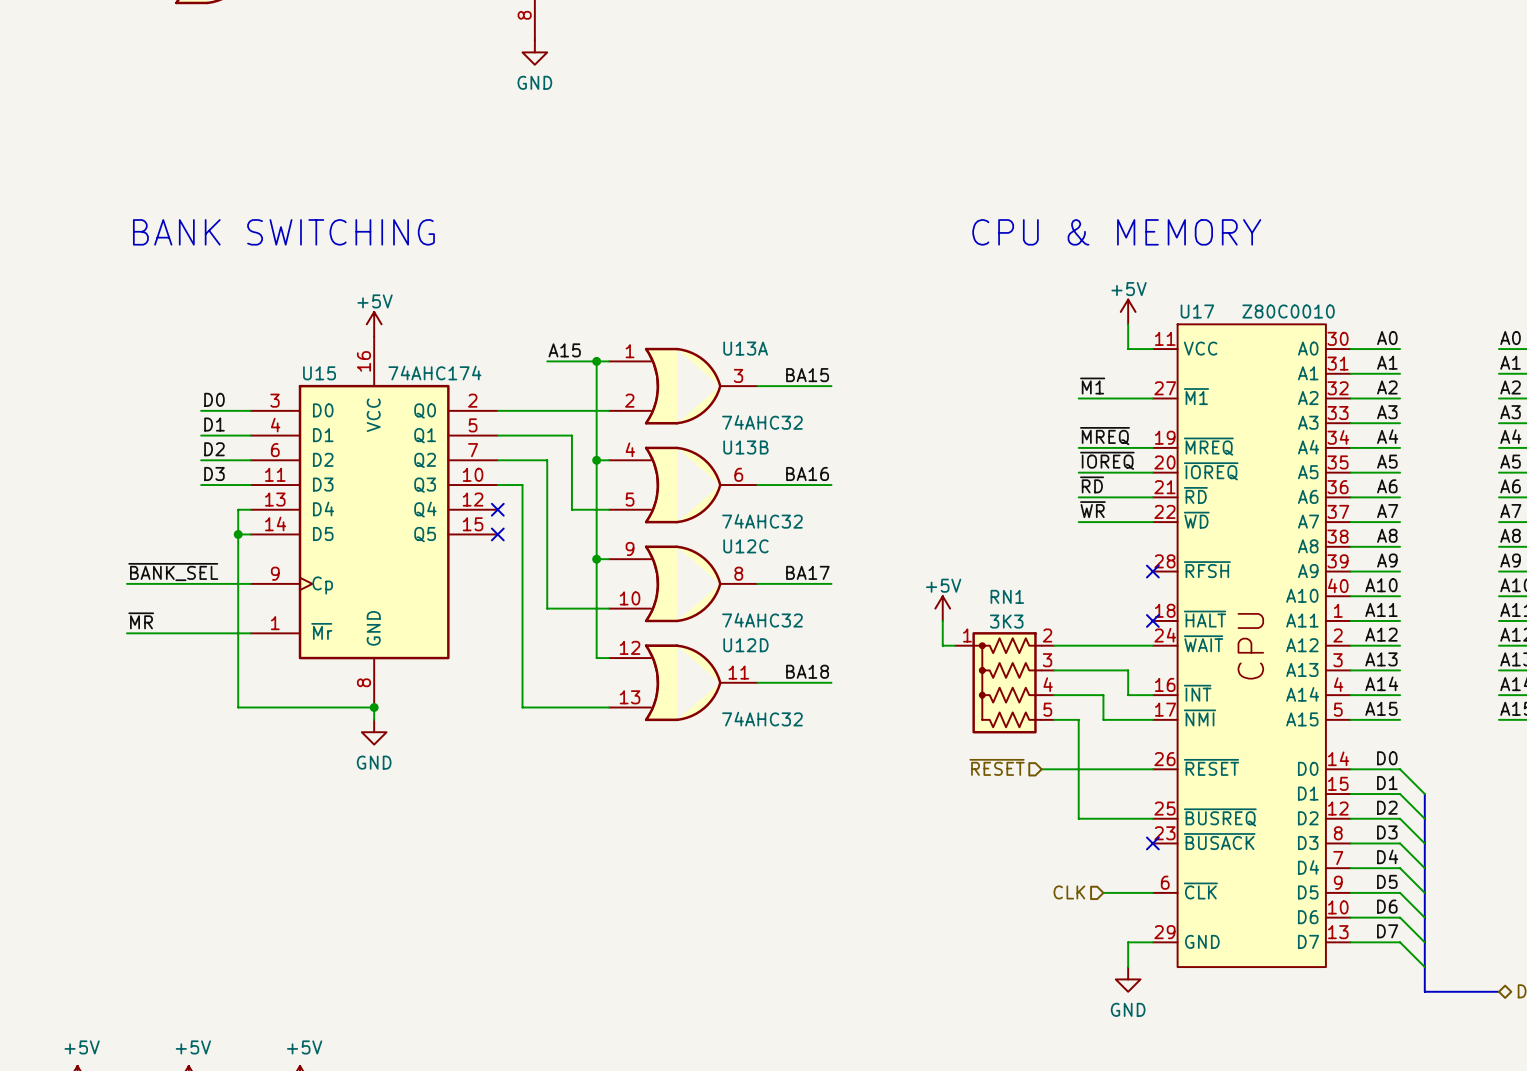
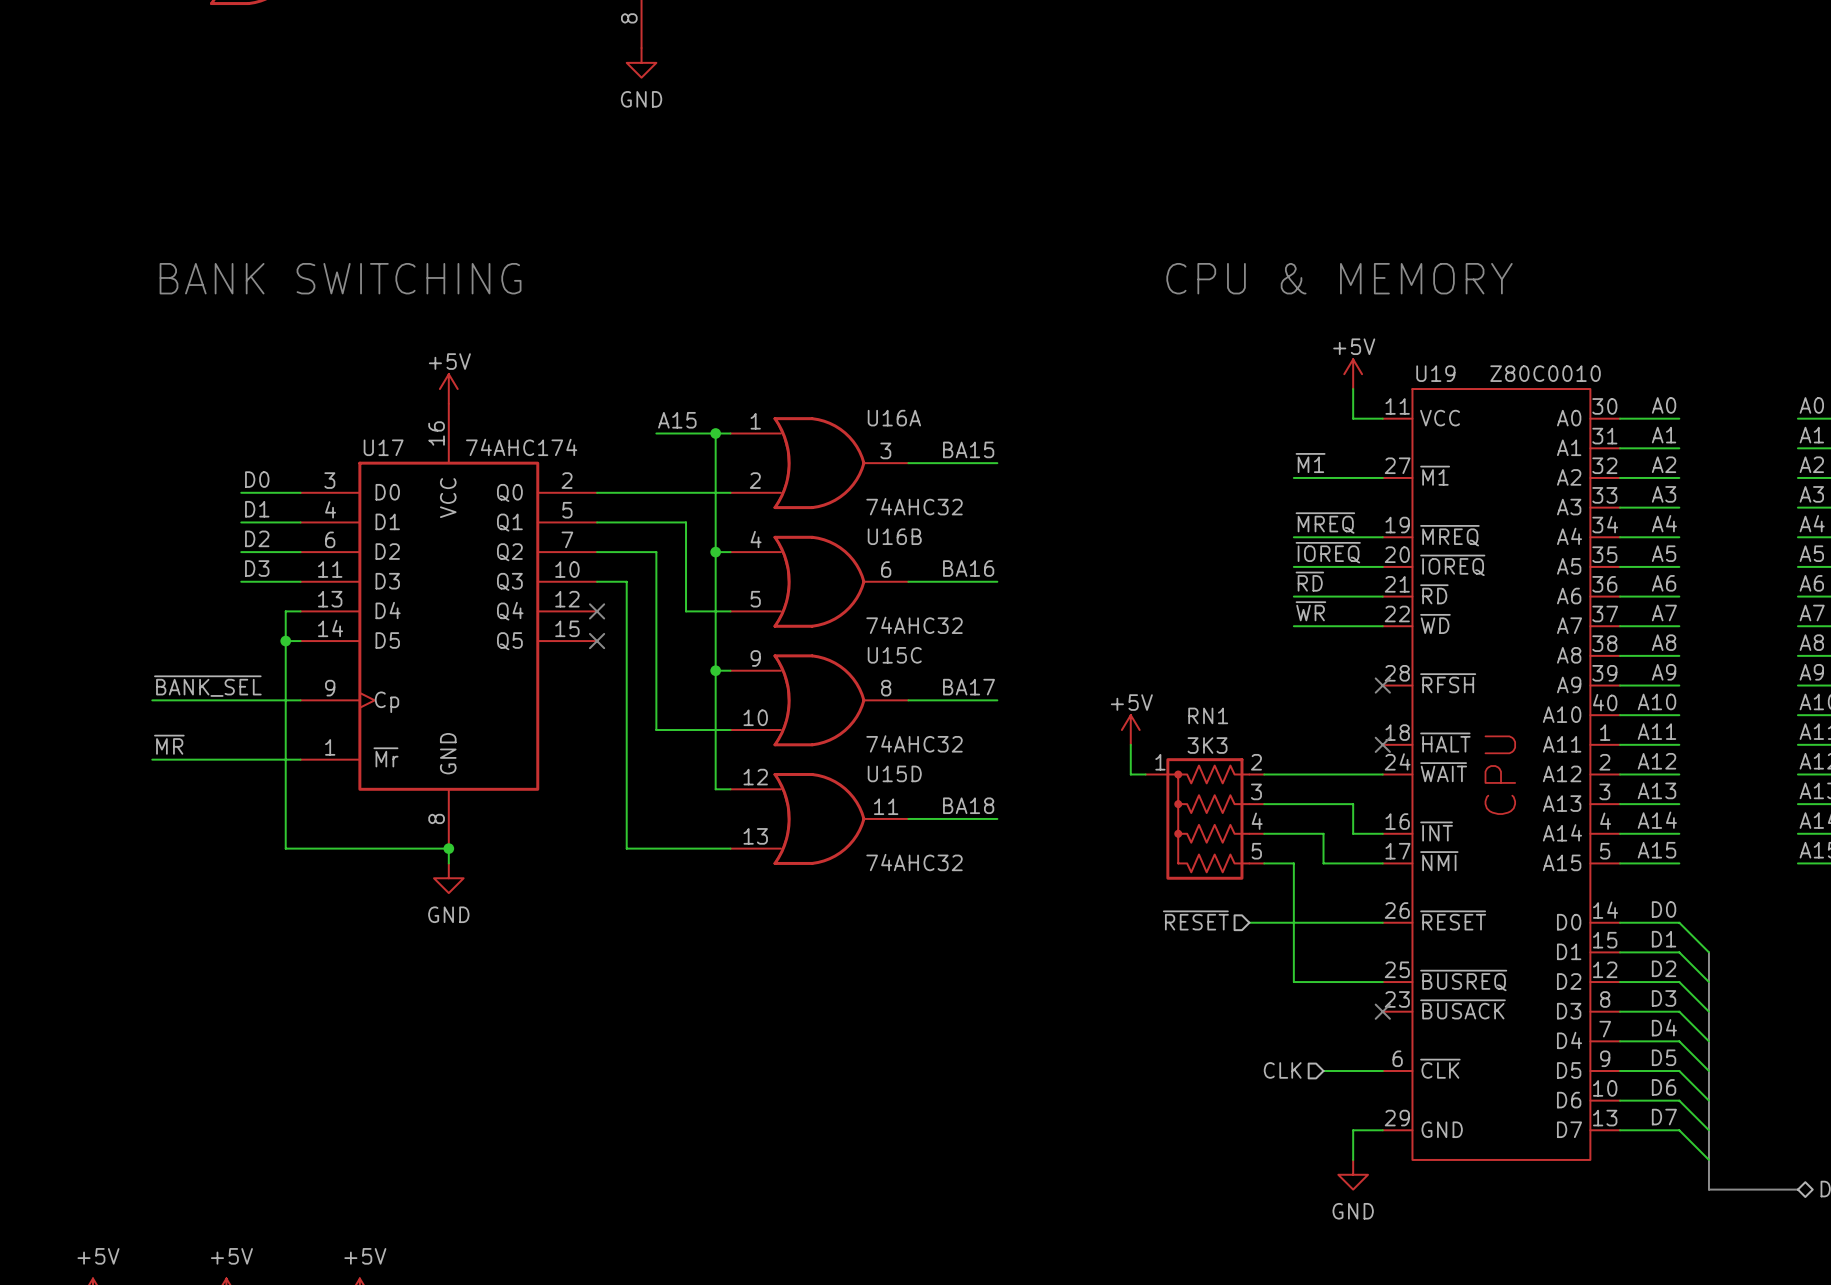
U17 name: U17 (1197, 311) -> U19 (1435, 373)
U13A name: U13A (745, 348) -> U16A (894, 418)
U15 name: U15 (319, 373) -> U17 (383, 447)
U13B name: U13B (745, 447) -> U16B (894, 536)
U12C name: U12C (745, 546) -> U15C (894, 655)
U12D name: U12D (745, 645) -> U15D (894, 773)

